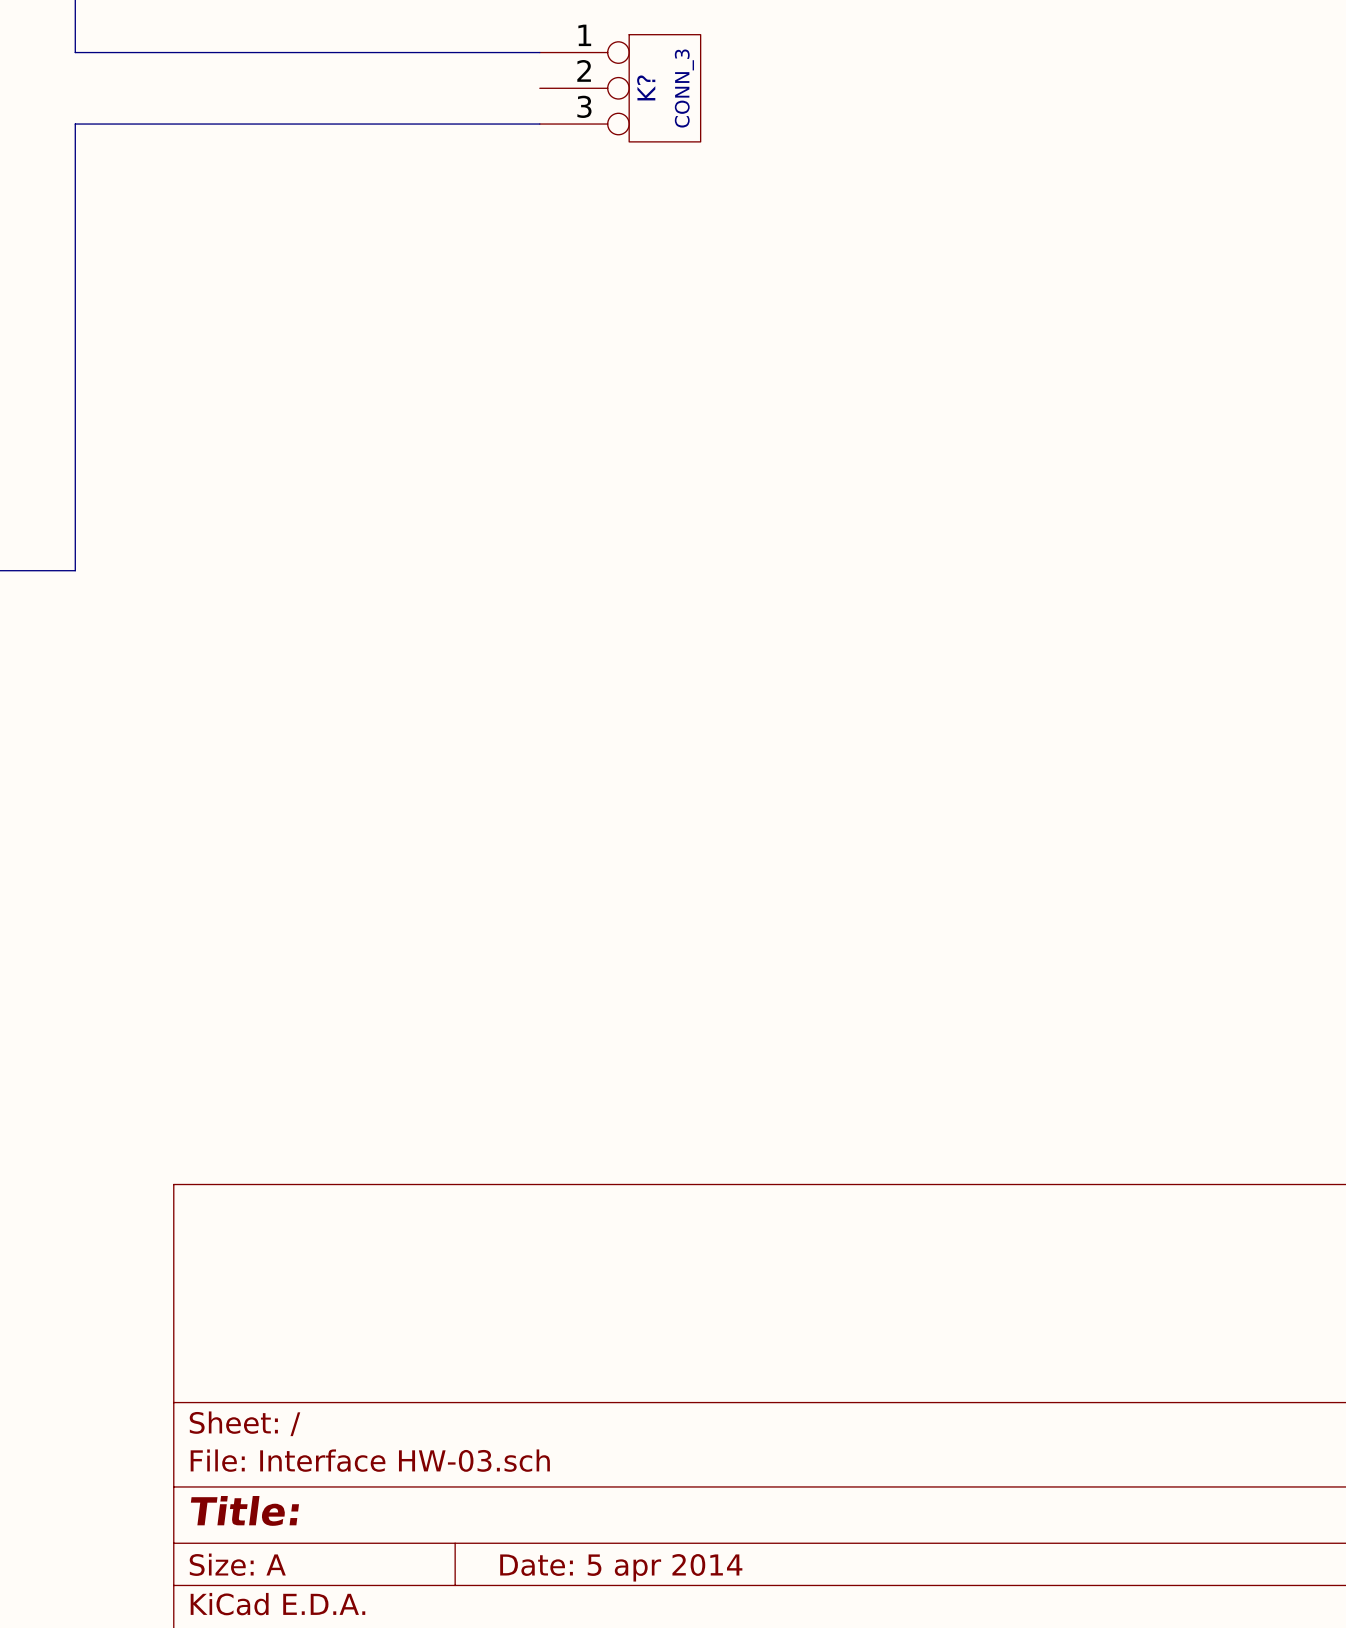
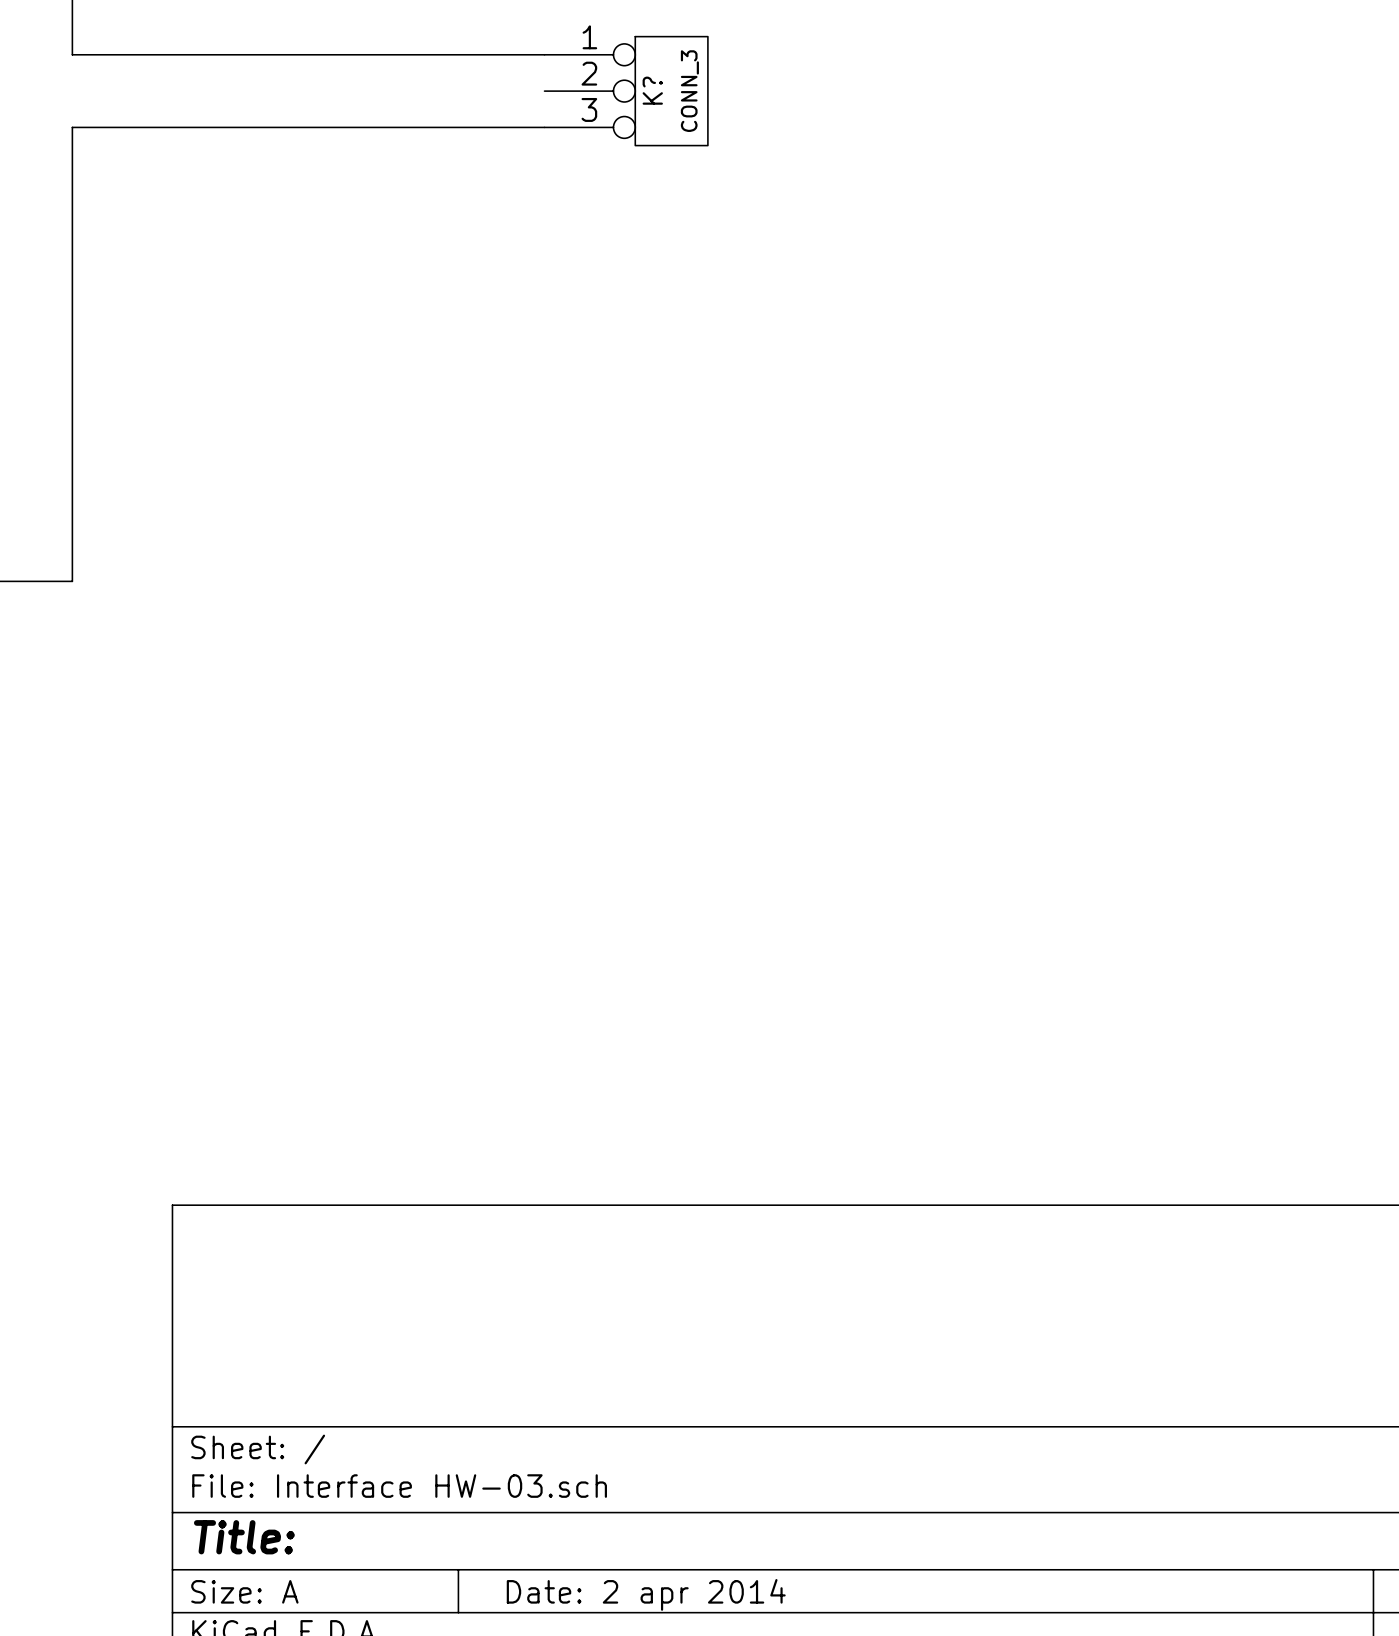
title block: Date: 5 apr 2014 (621, 1567) -> Date: 2 apr 2014 (646, 1594)

